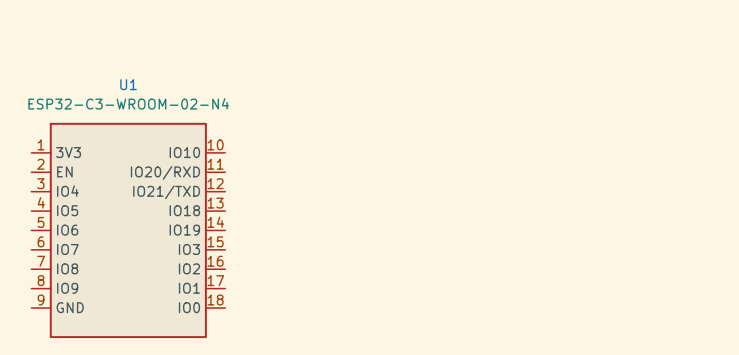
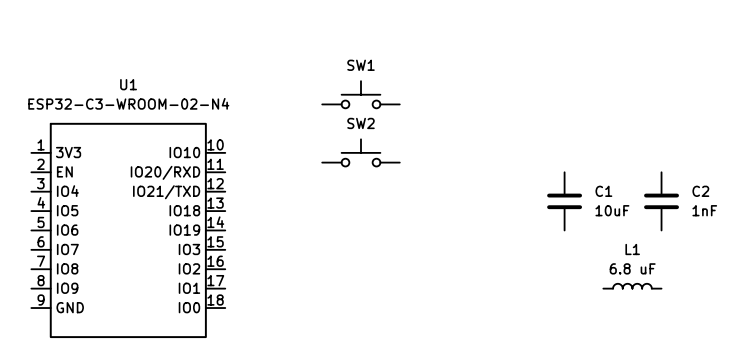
SW1: none -> (360, 94)
SW2: none -> (360, 152)
C1: none -> 10uF (564, 201)
C2: none -> 1nF (661, 201)
L1: none -> 6.8 uF (632, 286)

